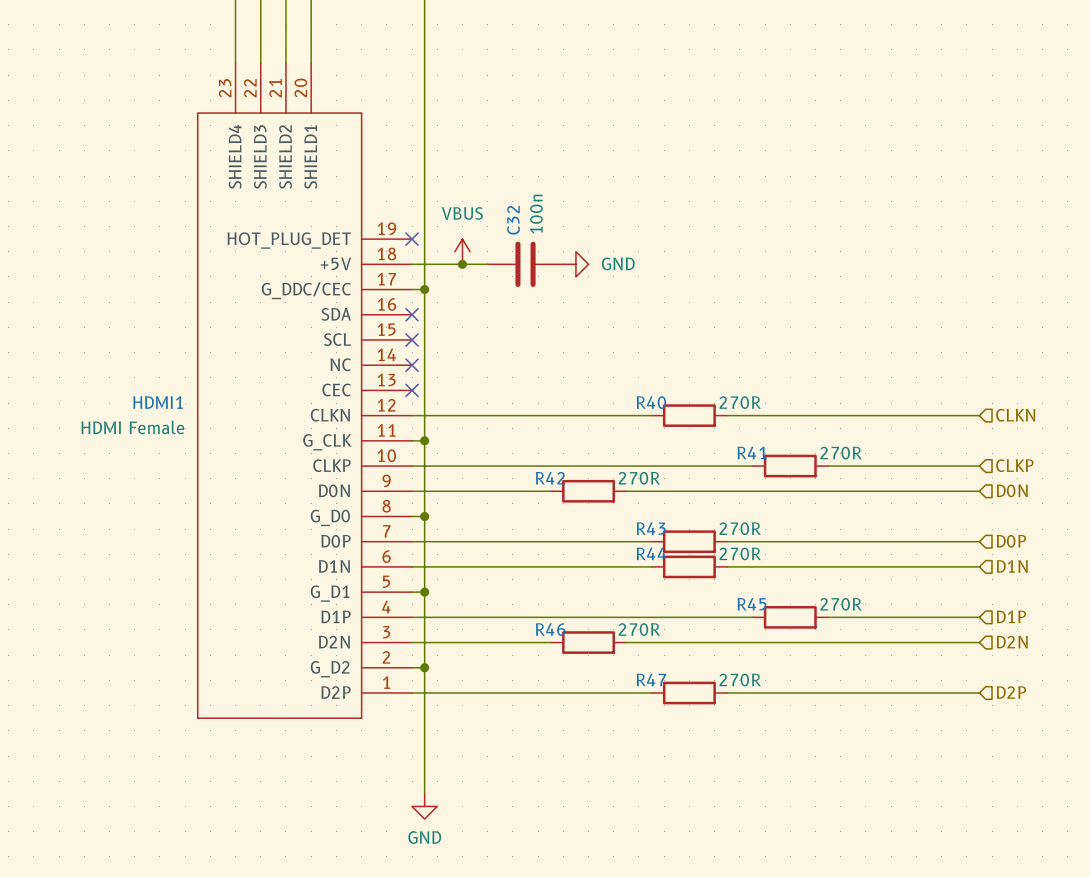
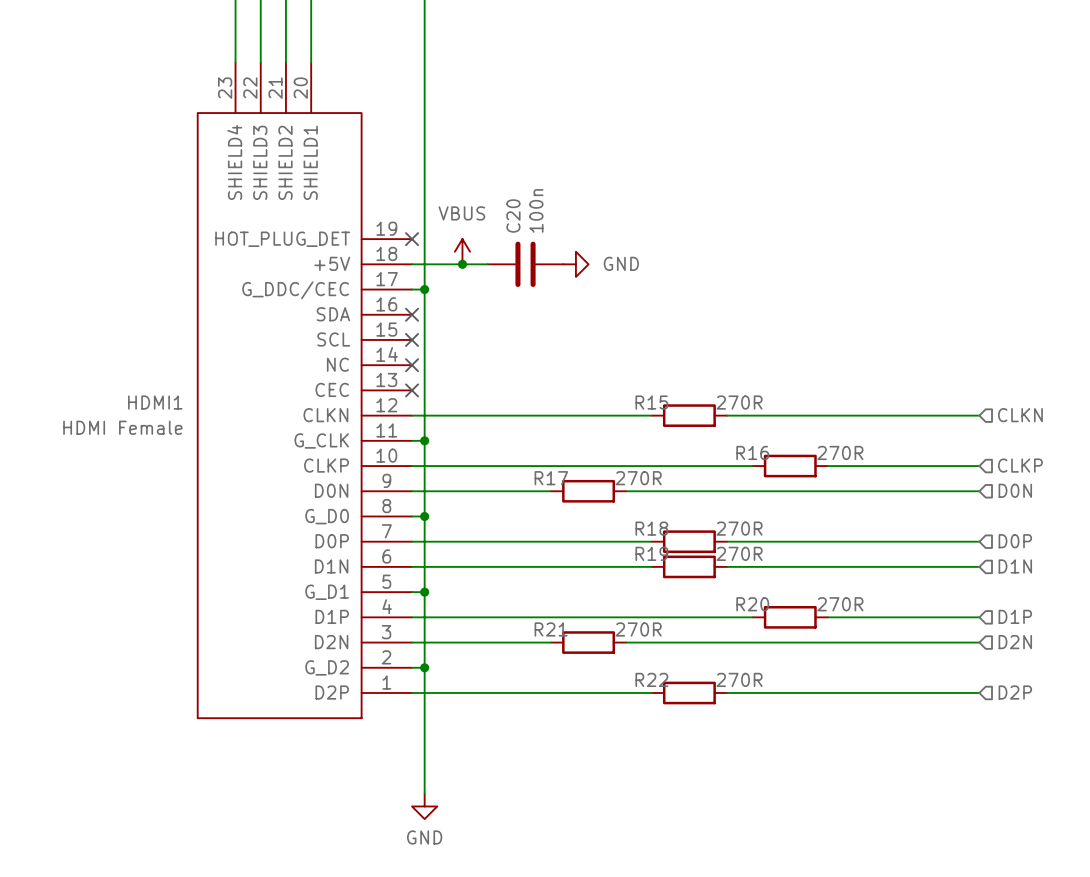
C32 name: C32 (513, 220) -> C20 (513, 216)
R40 name: R40 (651, 402) -> R15 (651, 402)
R41 name: R41 (752, 452) -> R16 (752, 452)
R42 name: R42 (550, 478) -> R17 (551, 478)
R43 name: R43 (651, 528) -> R18 (651, 528)
R44 name: R44 (651, 553) -> R19 (651, 553)
R45 name: R45 (752, 604) -> R20 (752, 604)
R46 name: R46 (550, 629) -> R21 (551, 629)
R47 name: R47 (651, 679) -> R22 (651, 679)

